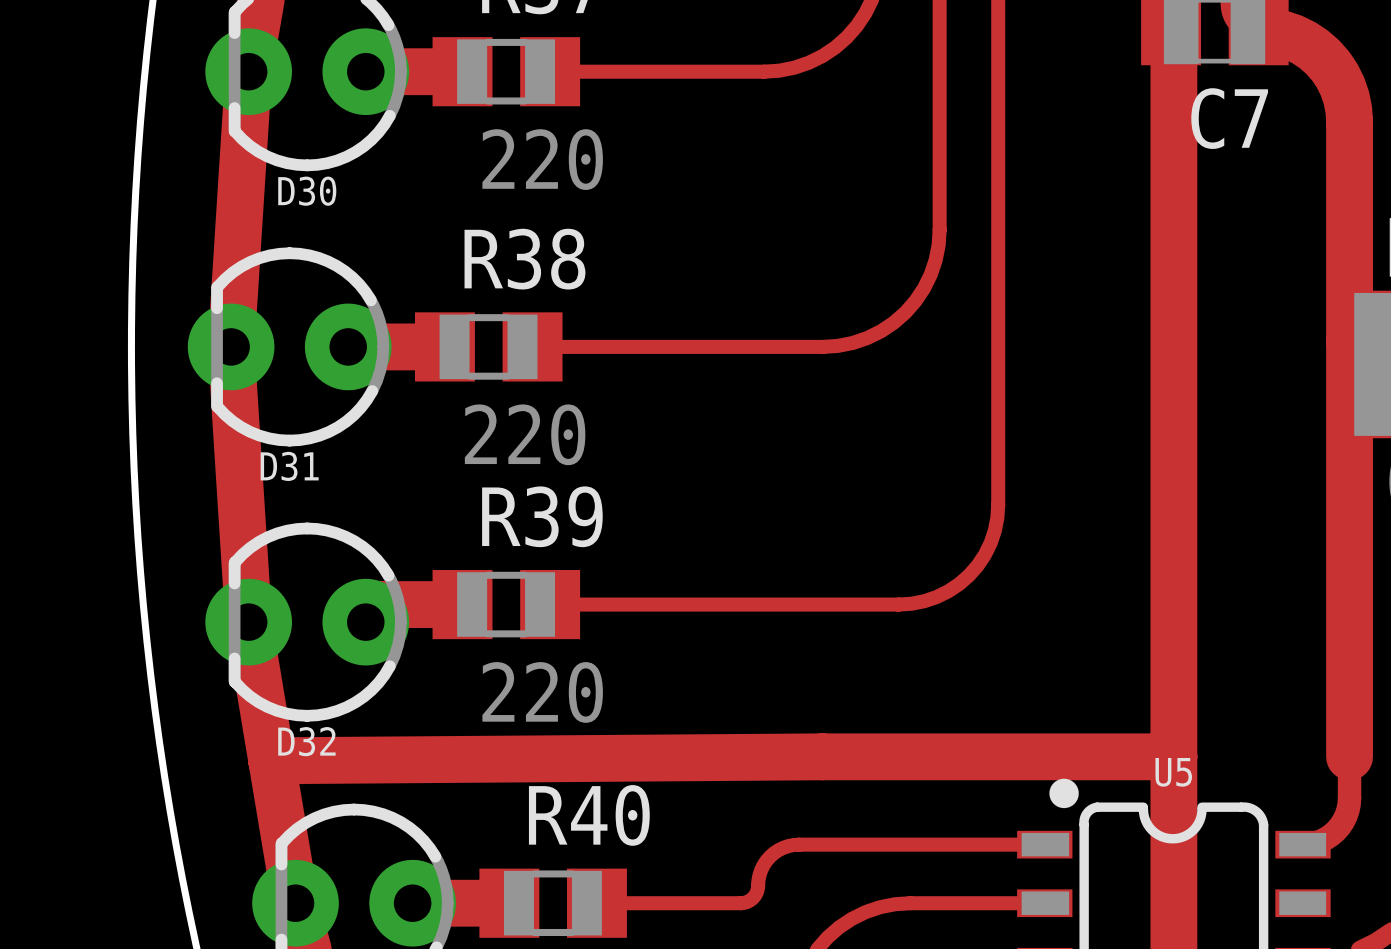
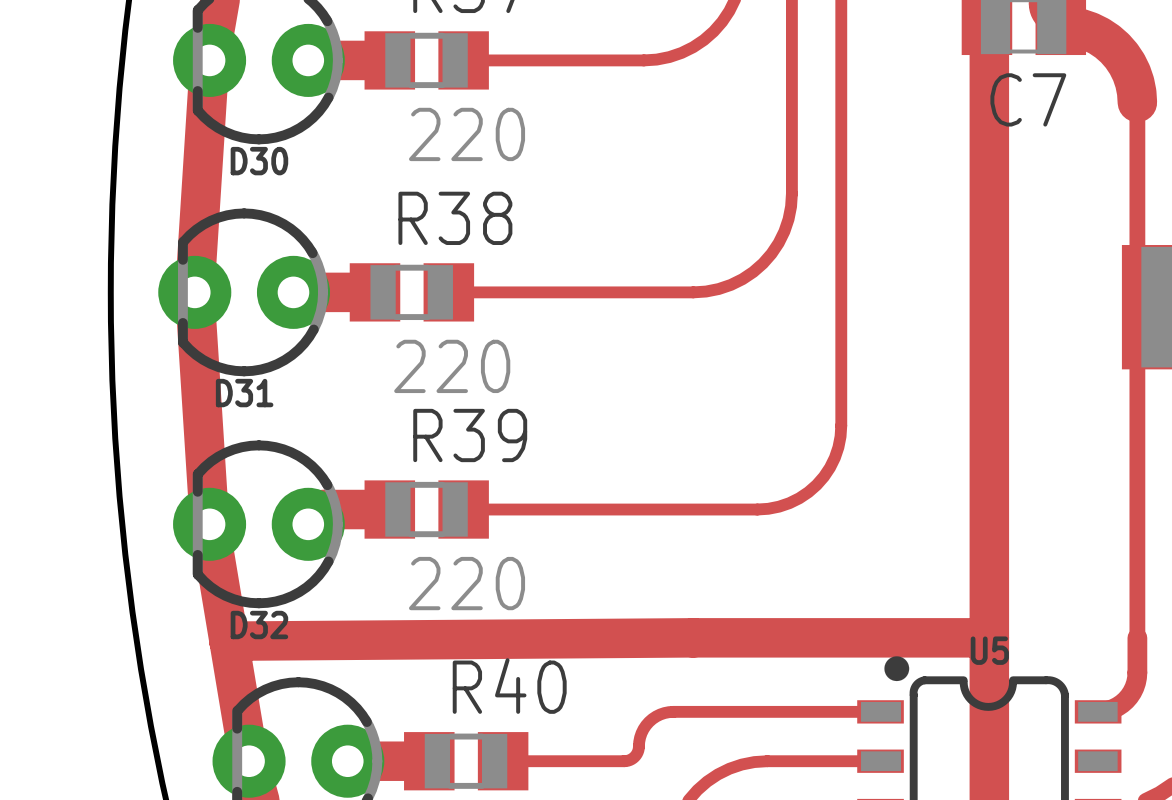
track width: thick (1349, 121) (1349, 341) -> thin (1137, 102) (1137, 287)
track: (1349, 341) (1349, 756) -> none

